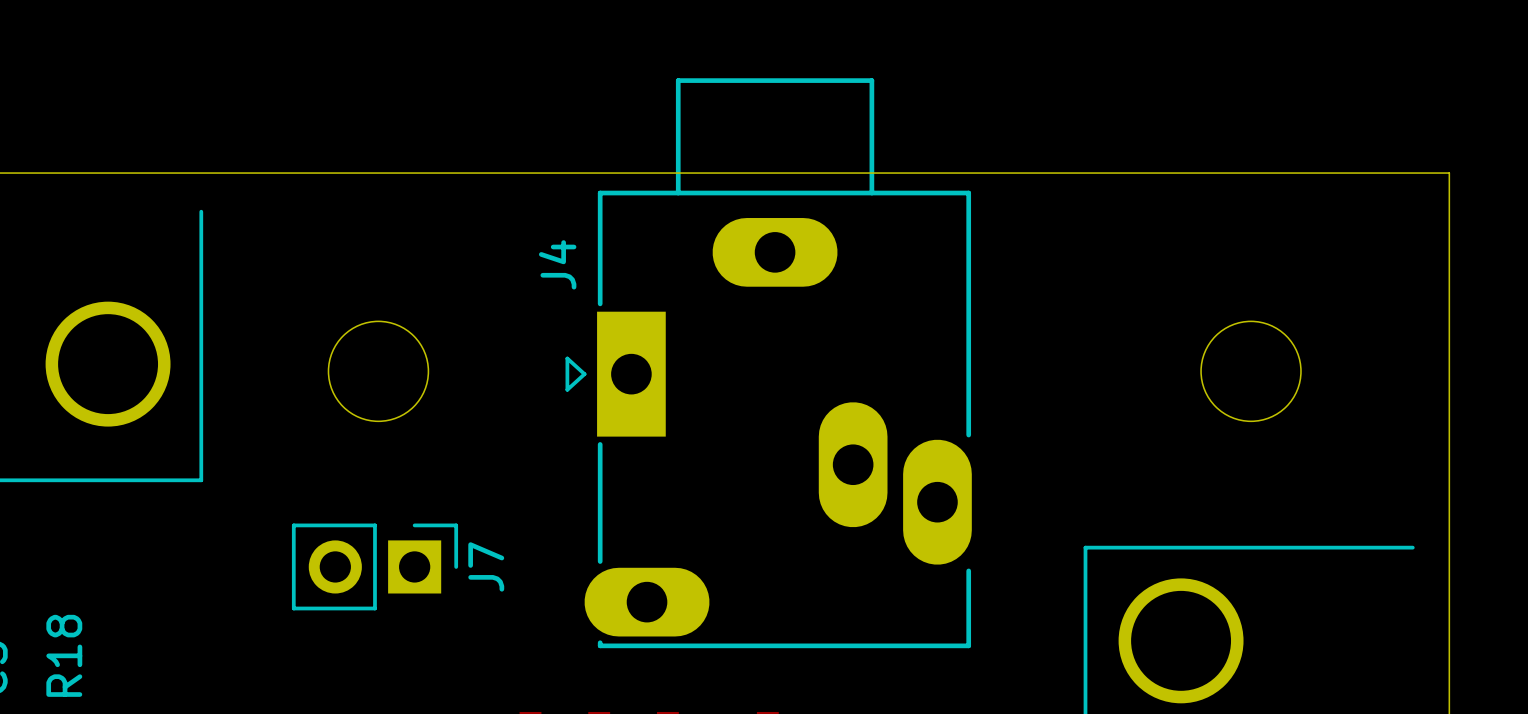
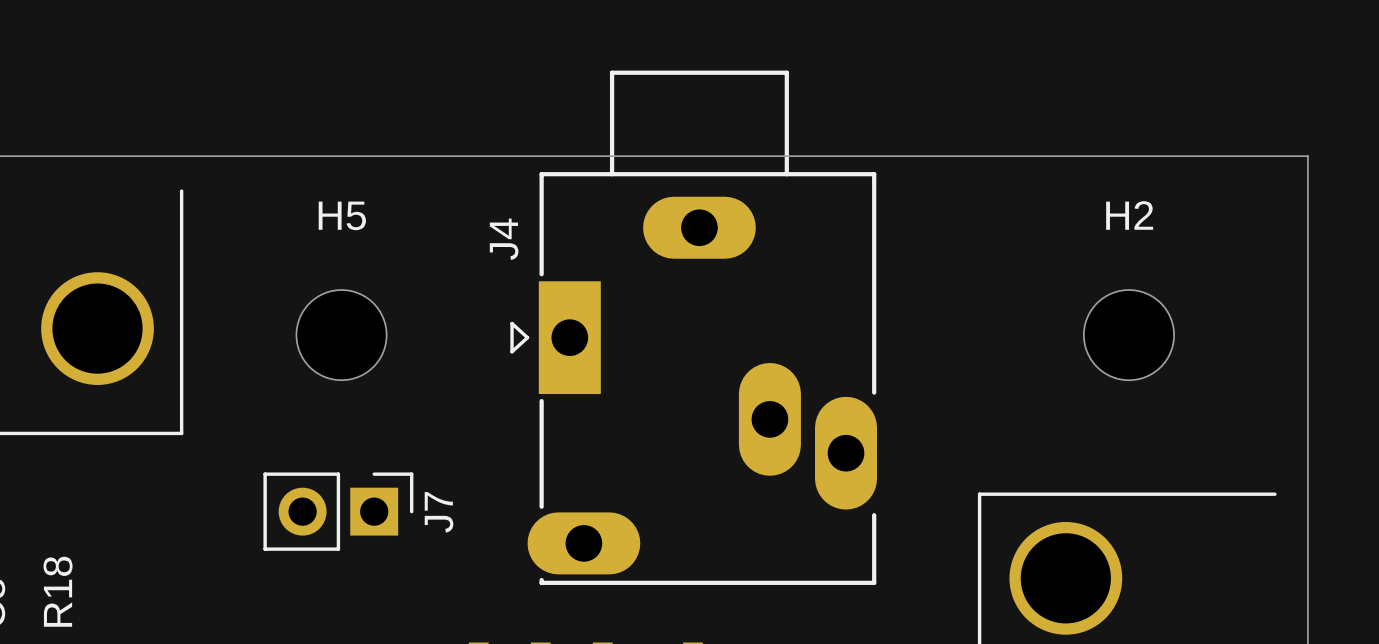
H5 name: none -> H5 (342, 215)
H2 name: none -> H2 (1129, 215)

